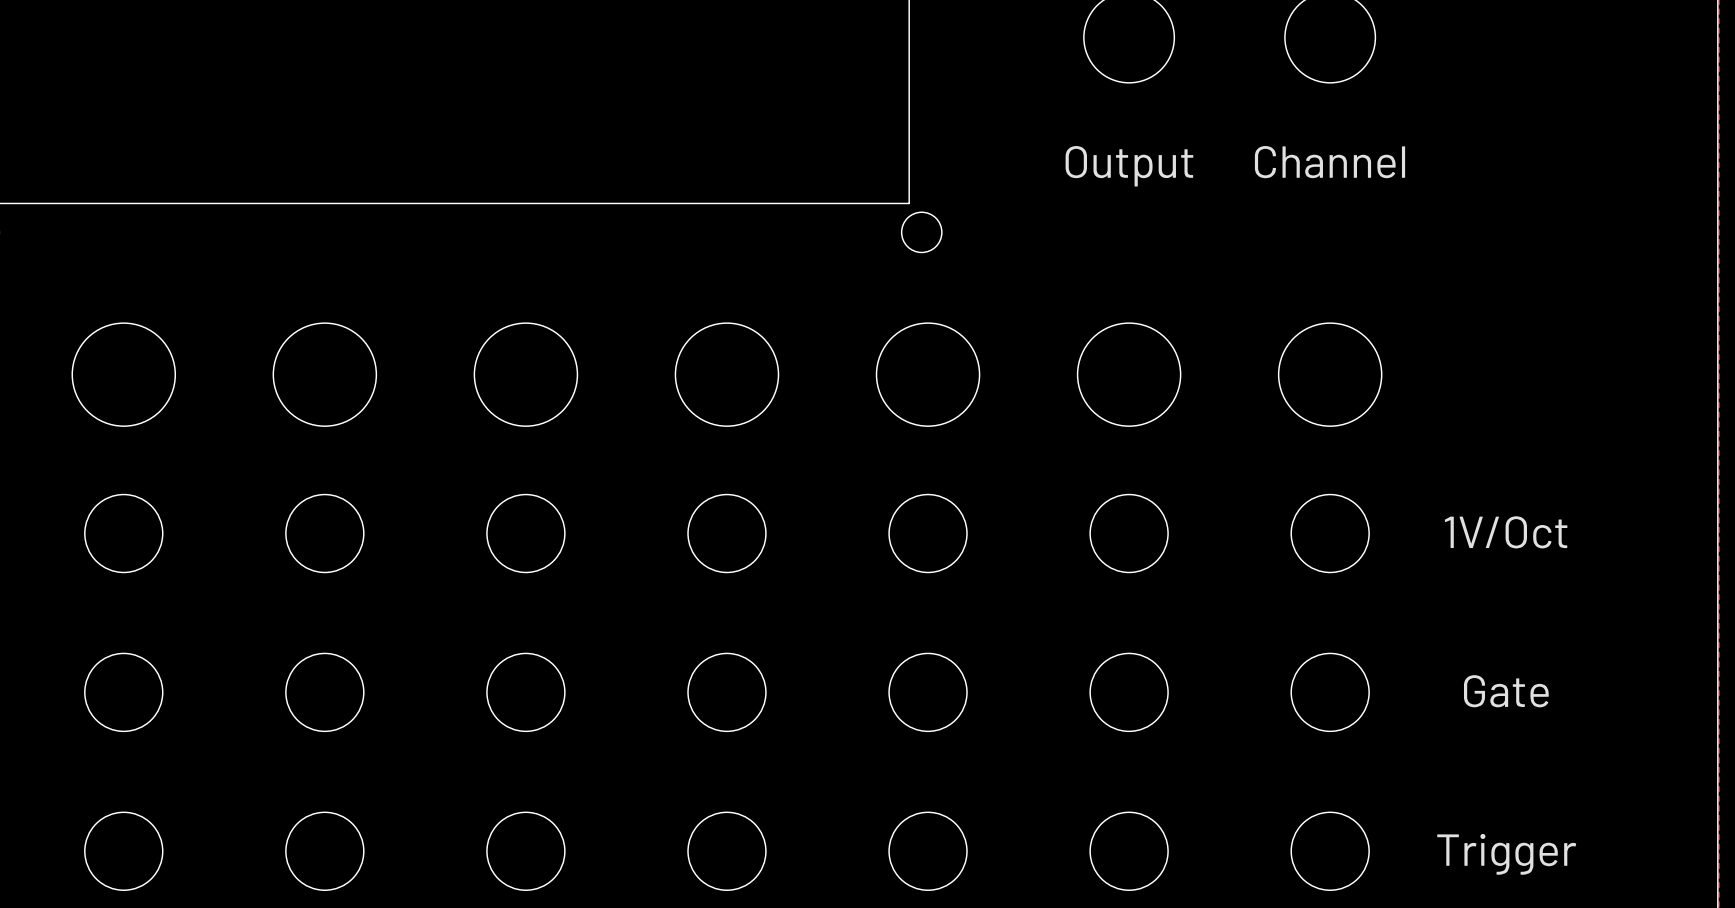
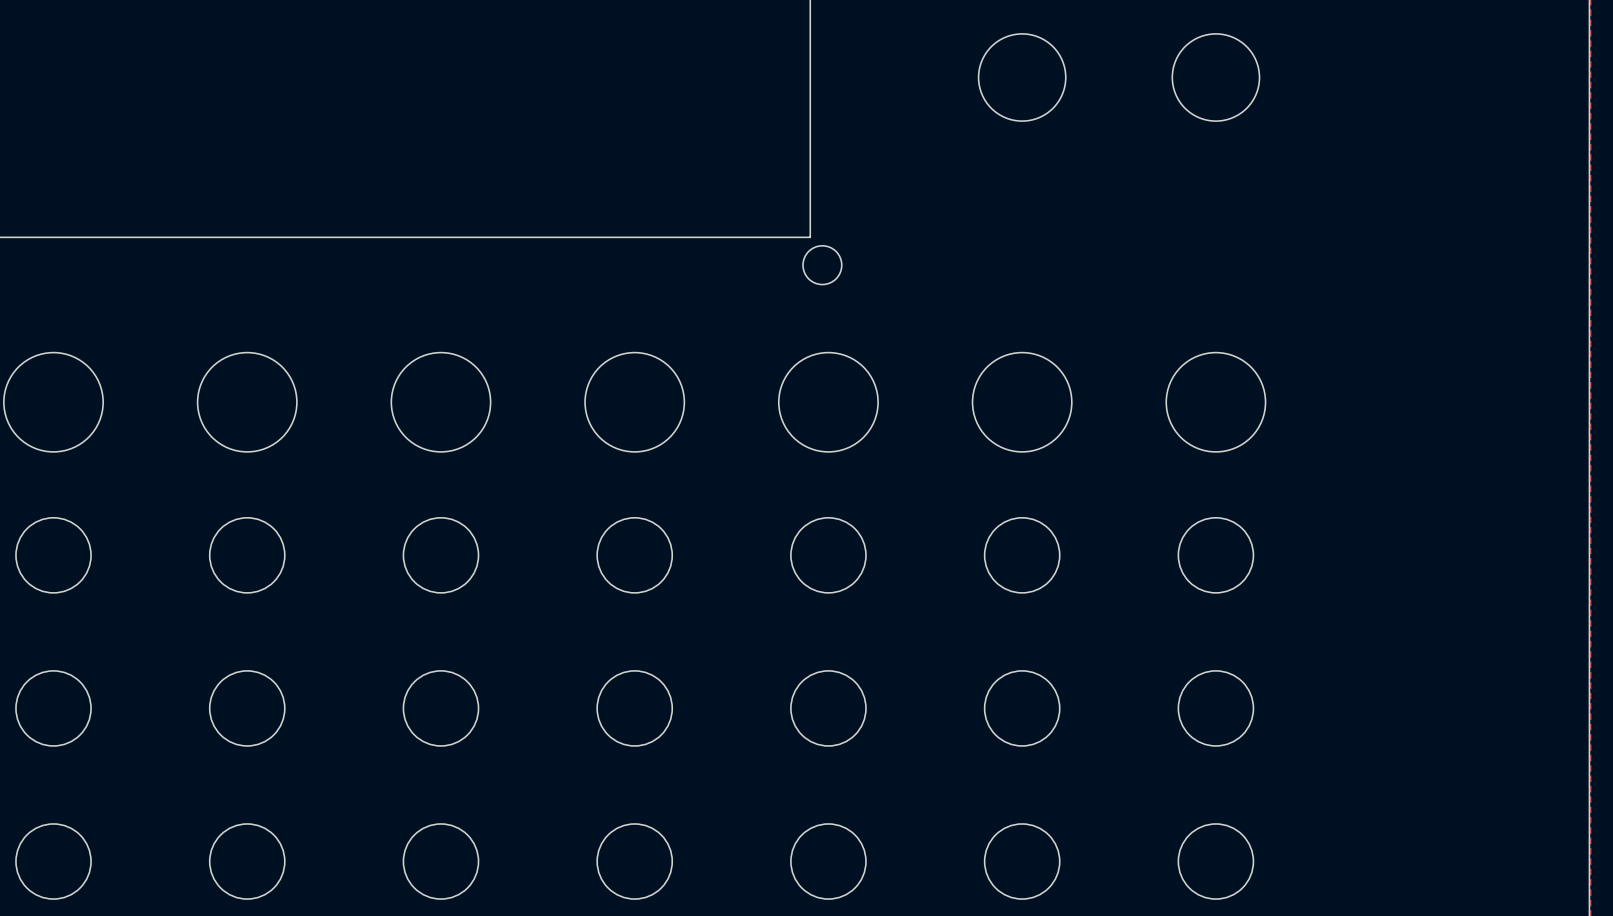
text: Channel (1330, 162) -> none
text: Output (1129, 166) -> none
text: 1V/Oct (1506, 532) -> none
text: Gate (1506, 691) -> none
text: Trigger (1506, 854) -> none

